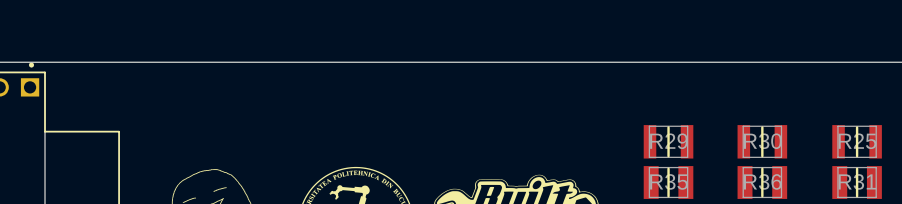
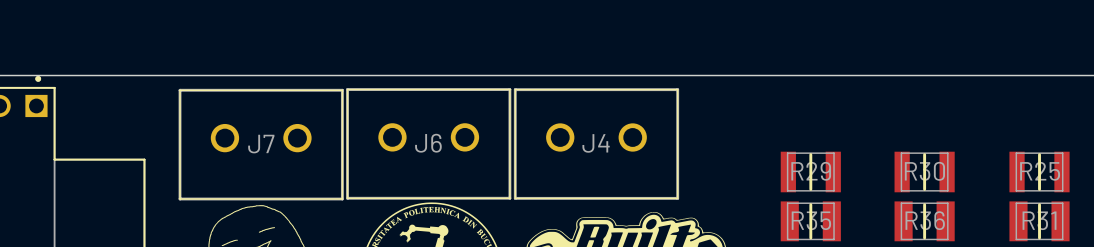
J6: none -> (428, 143)
J4: none -> (596, 144)
J7: none -> (261, 144)

